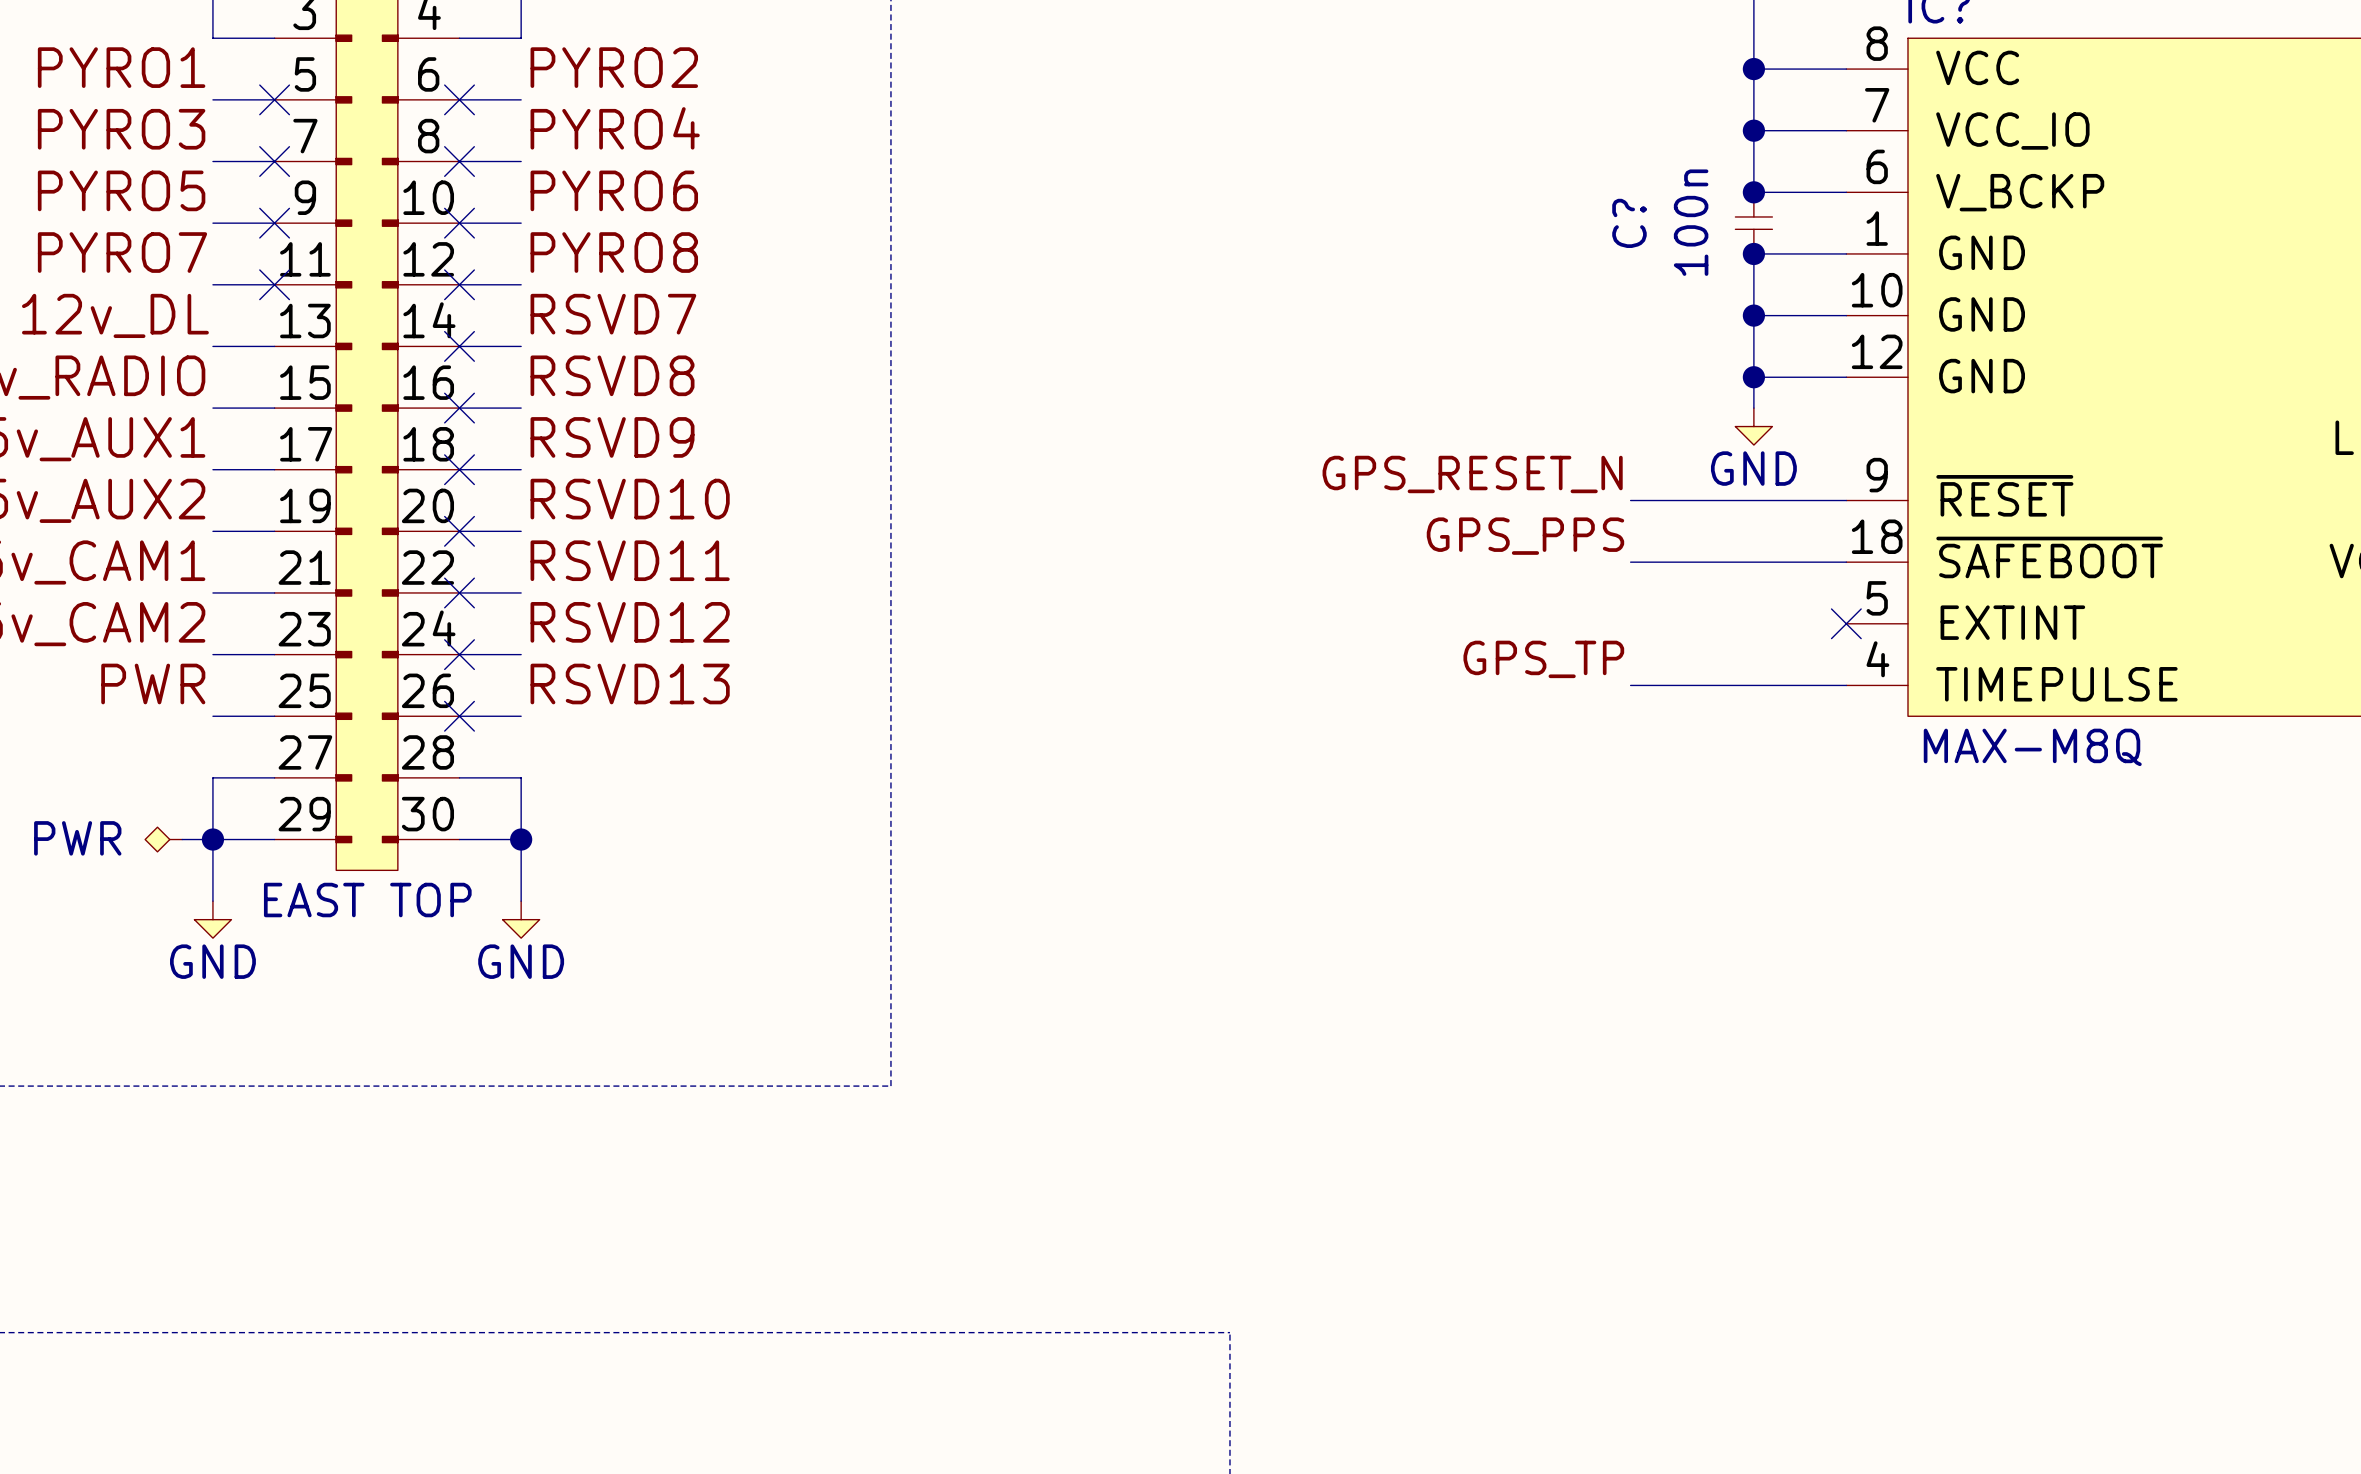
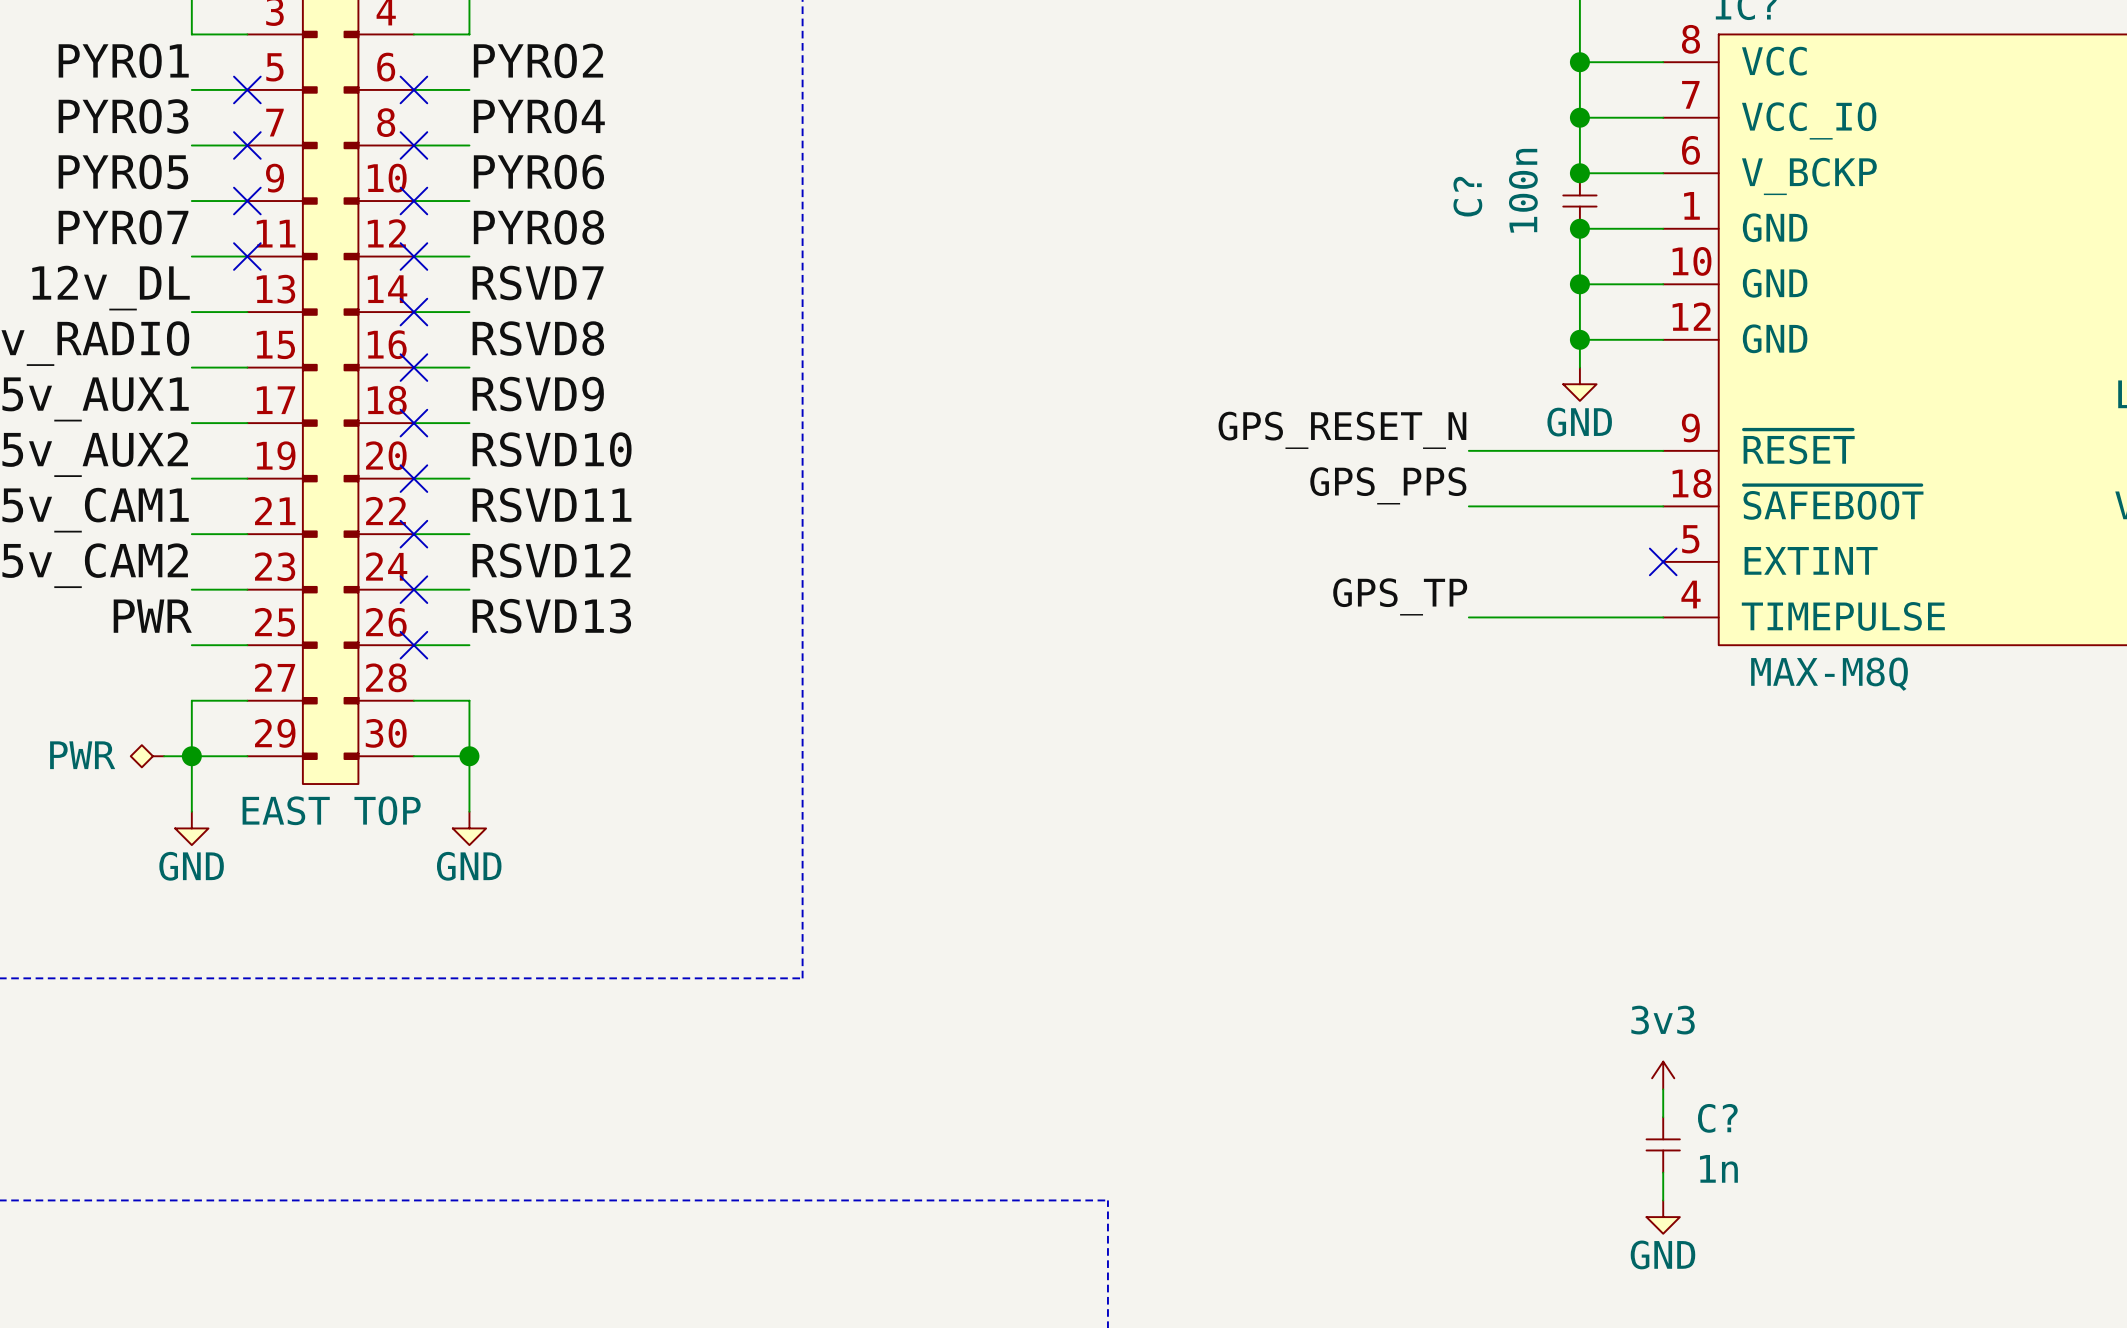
power symbol: none -> 3v3 (1663, 1075)
wire: none -> (1663, 1089) (1663, 1117)
C?: none -> 1n (1663, 1144)
wire: none -> (1663, 1172) (1663, 1200)
power symbol: none -> GND (1663, 1217)

